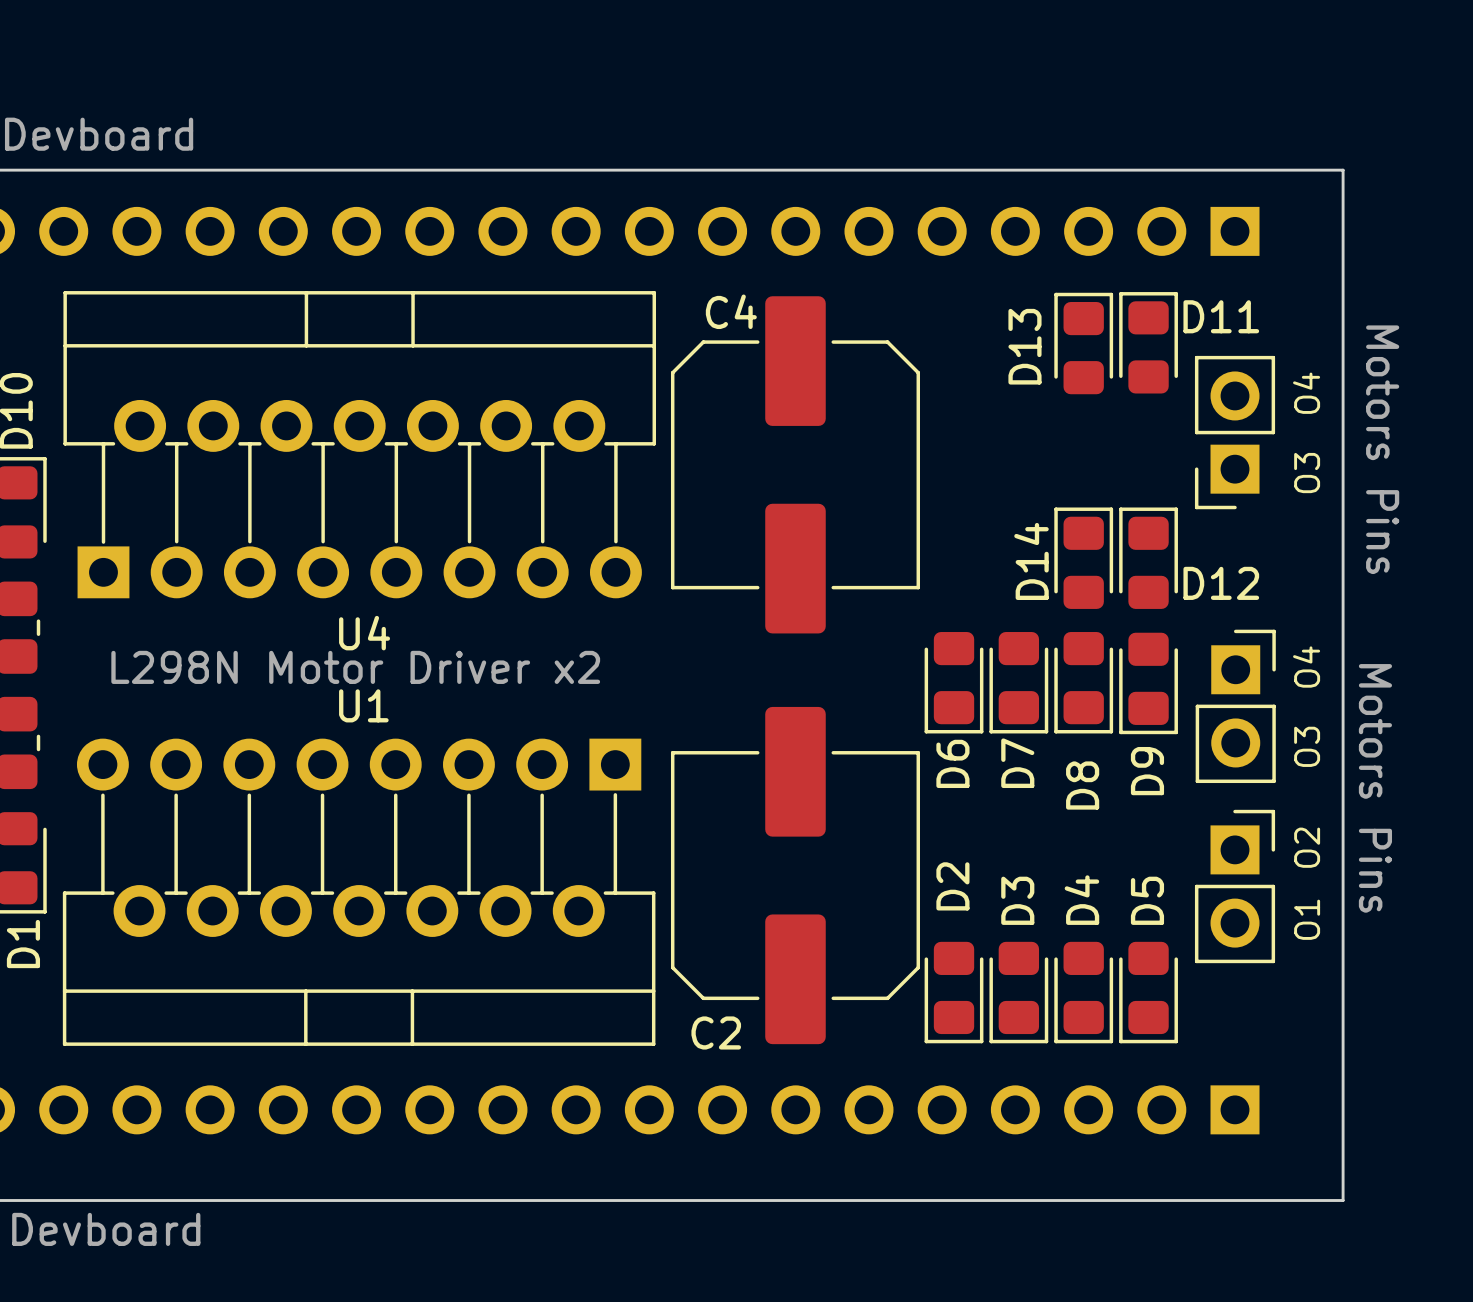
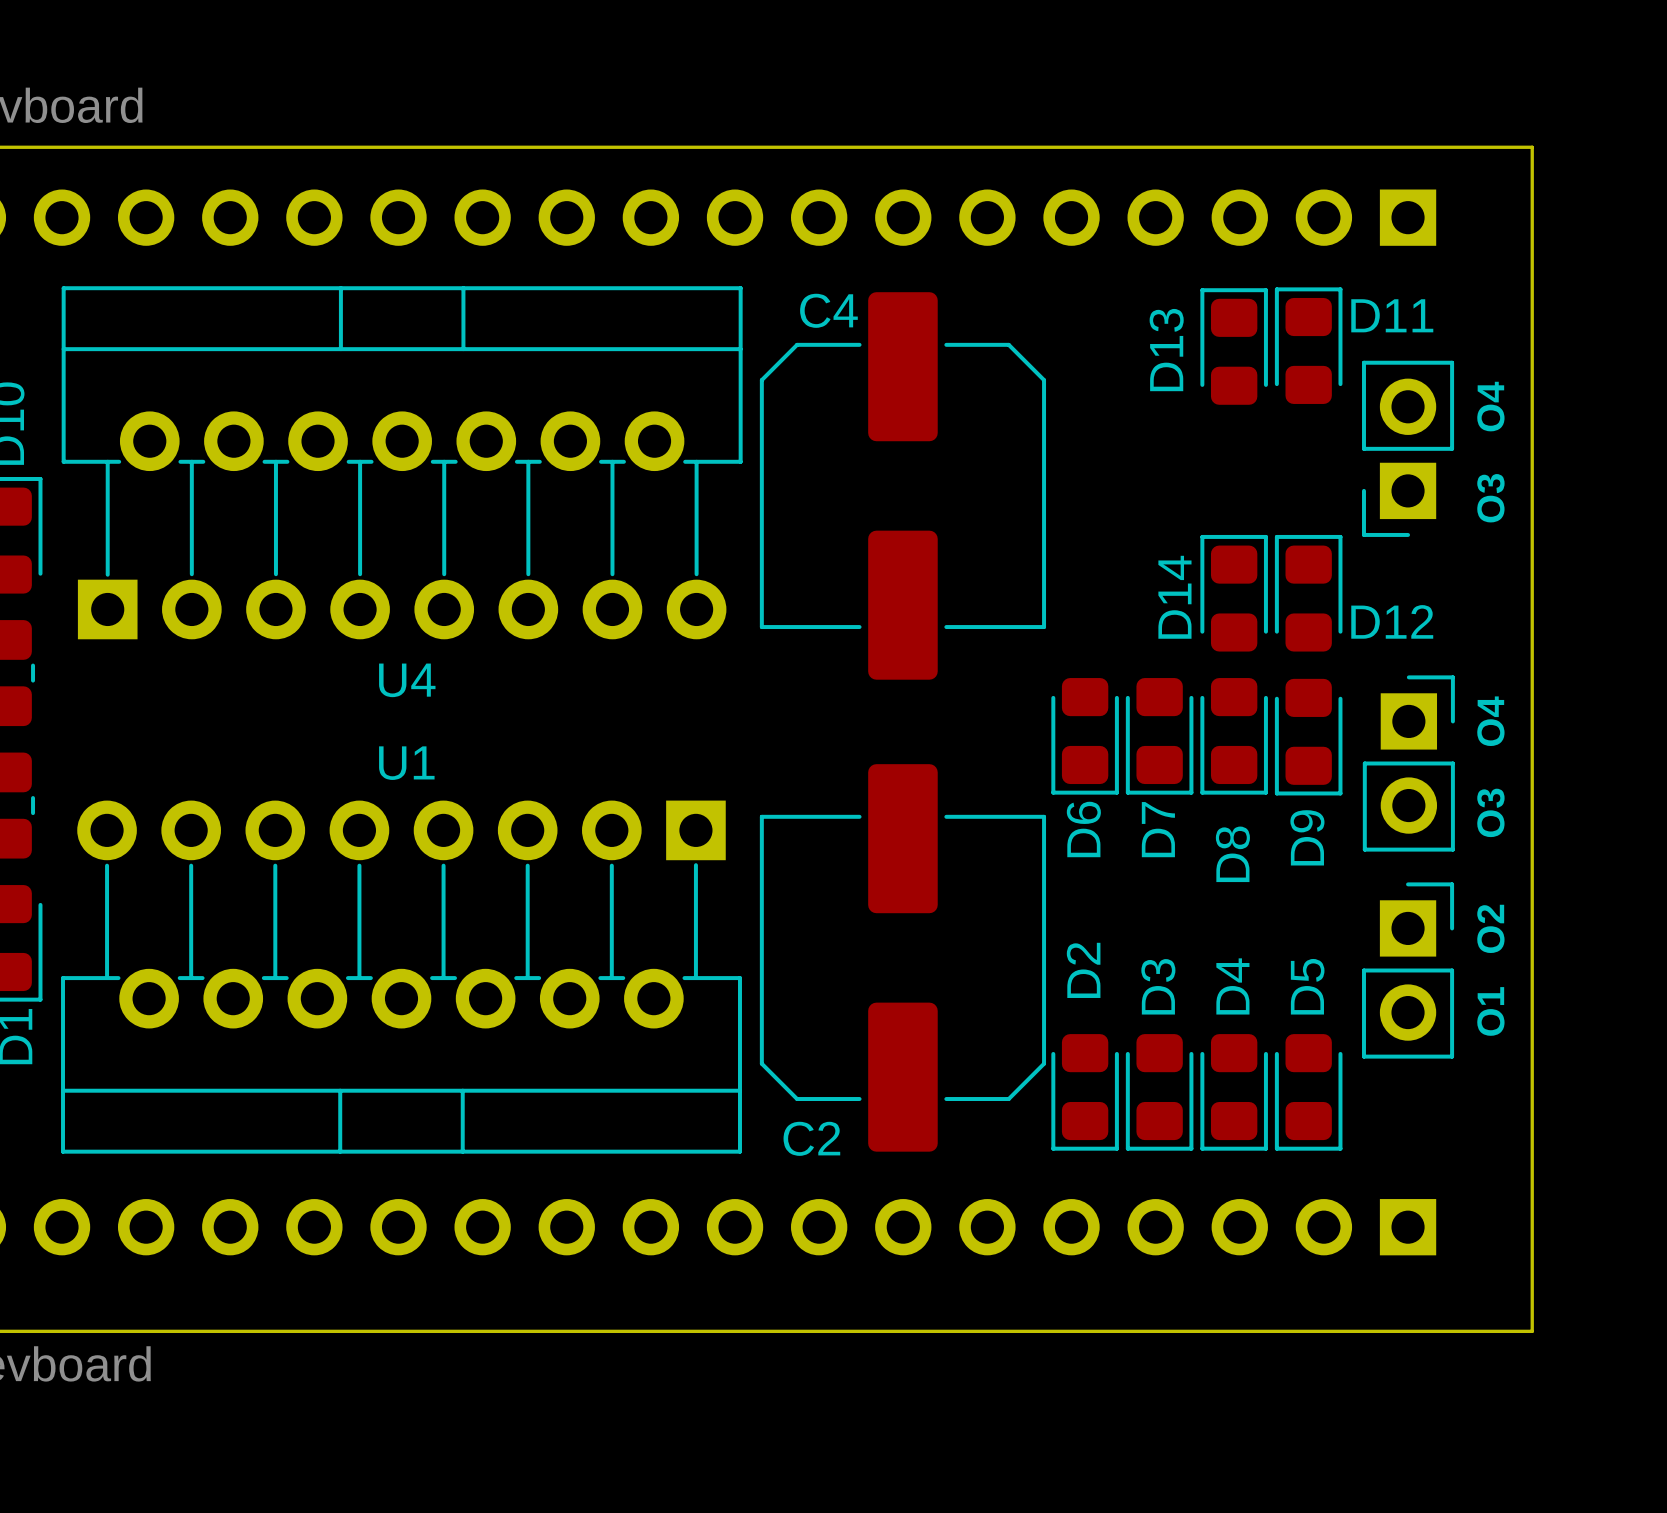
text: Motors Pins (1382, 449) -> none
text: L298N Motor Driver x2 (355, 667) -> none
text: Motors Pins (1375, 788) -> none

